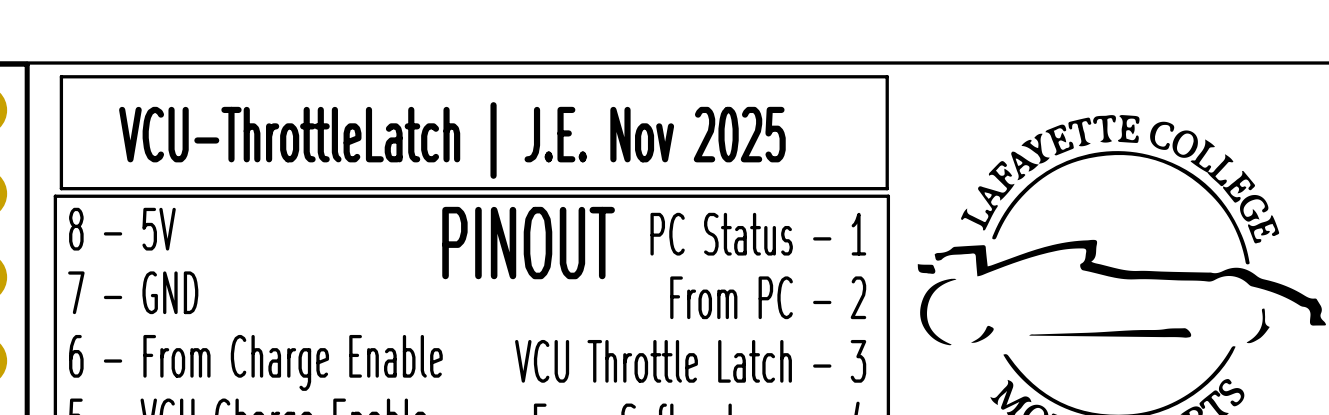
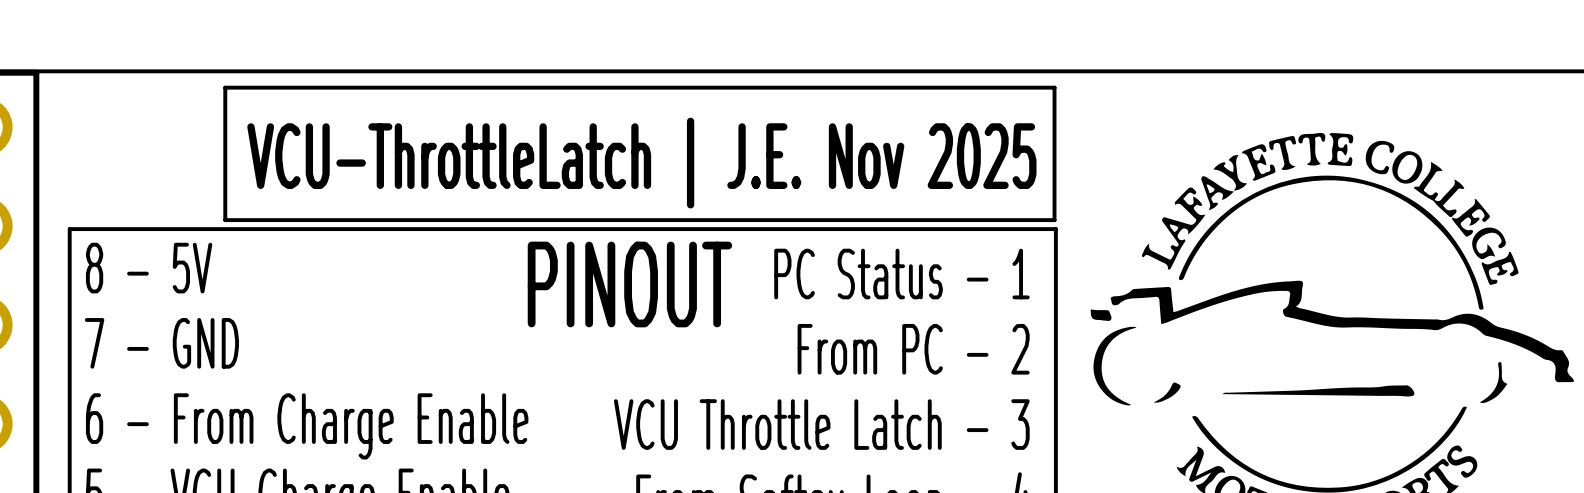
line: (186, 76) (61, 76) (61, 188) (186, 188) -> (225, 87) (225, 220)
text position: VCU-ThrottleLatch | J.E. Nov 2025 (452, 140) -> VCU-ThrottleLatch | J.E. Nov 2025 (641, 163)

